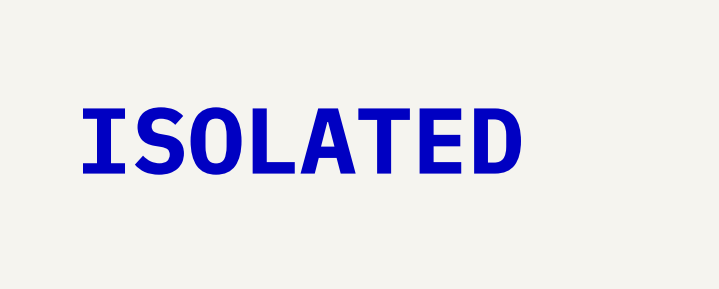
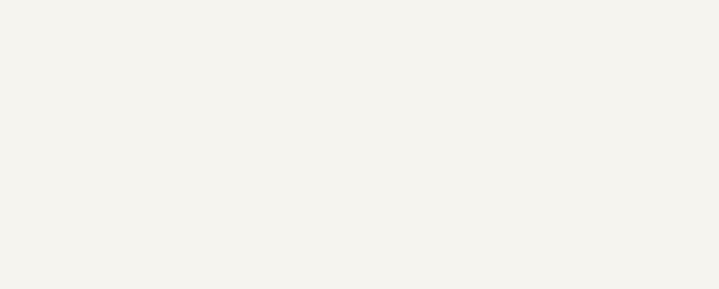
text: ISOLATED (301, 141) -> none

